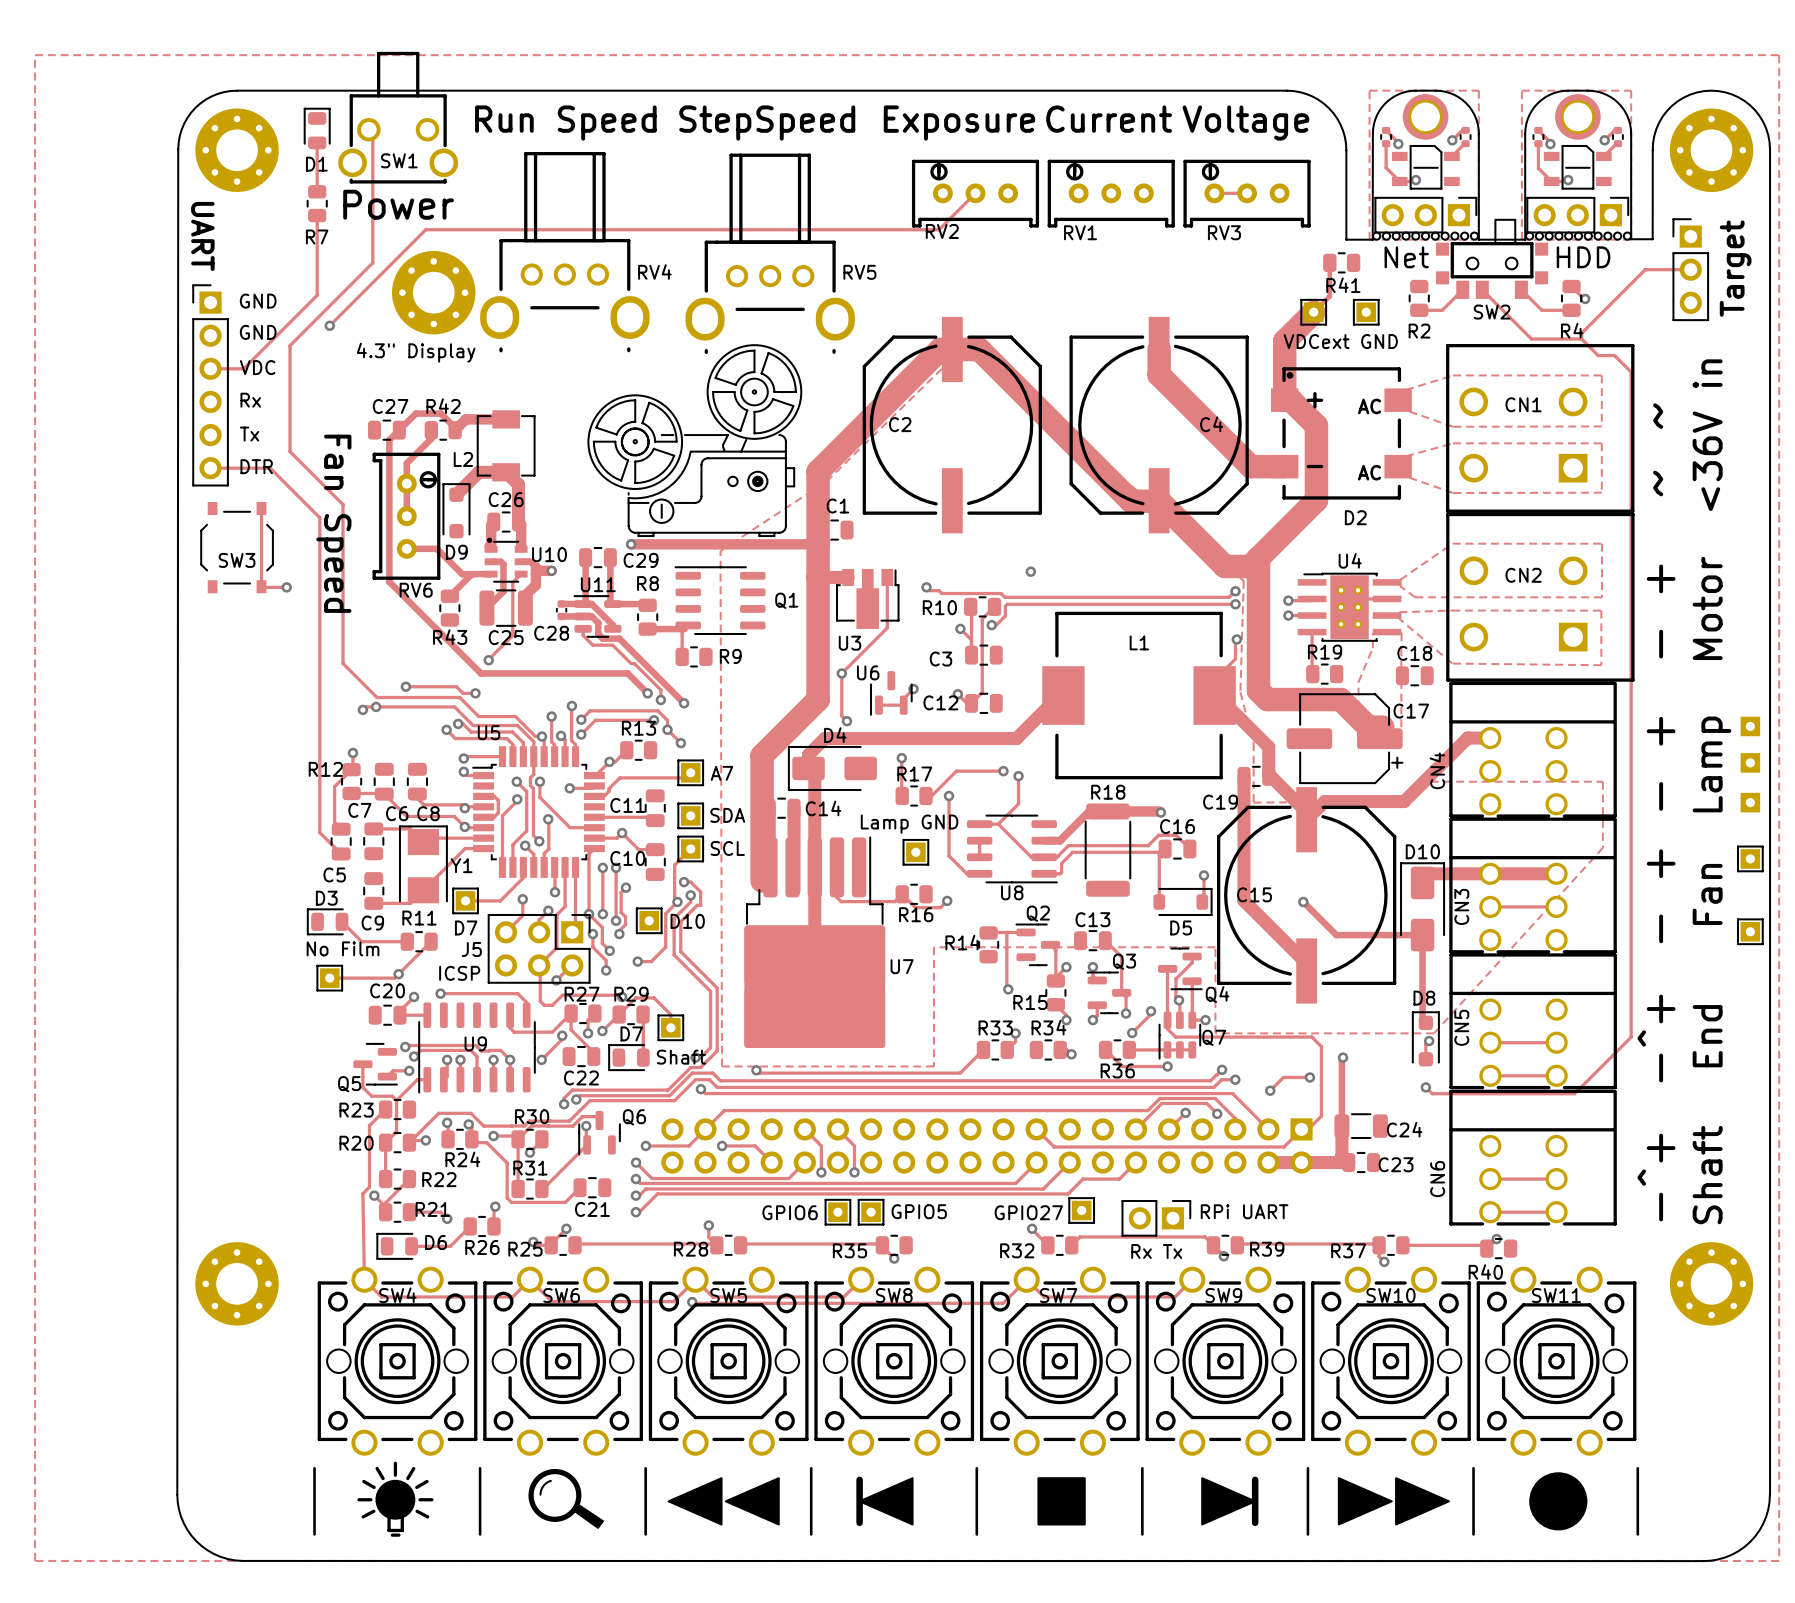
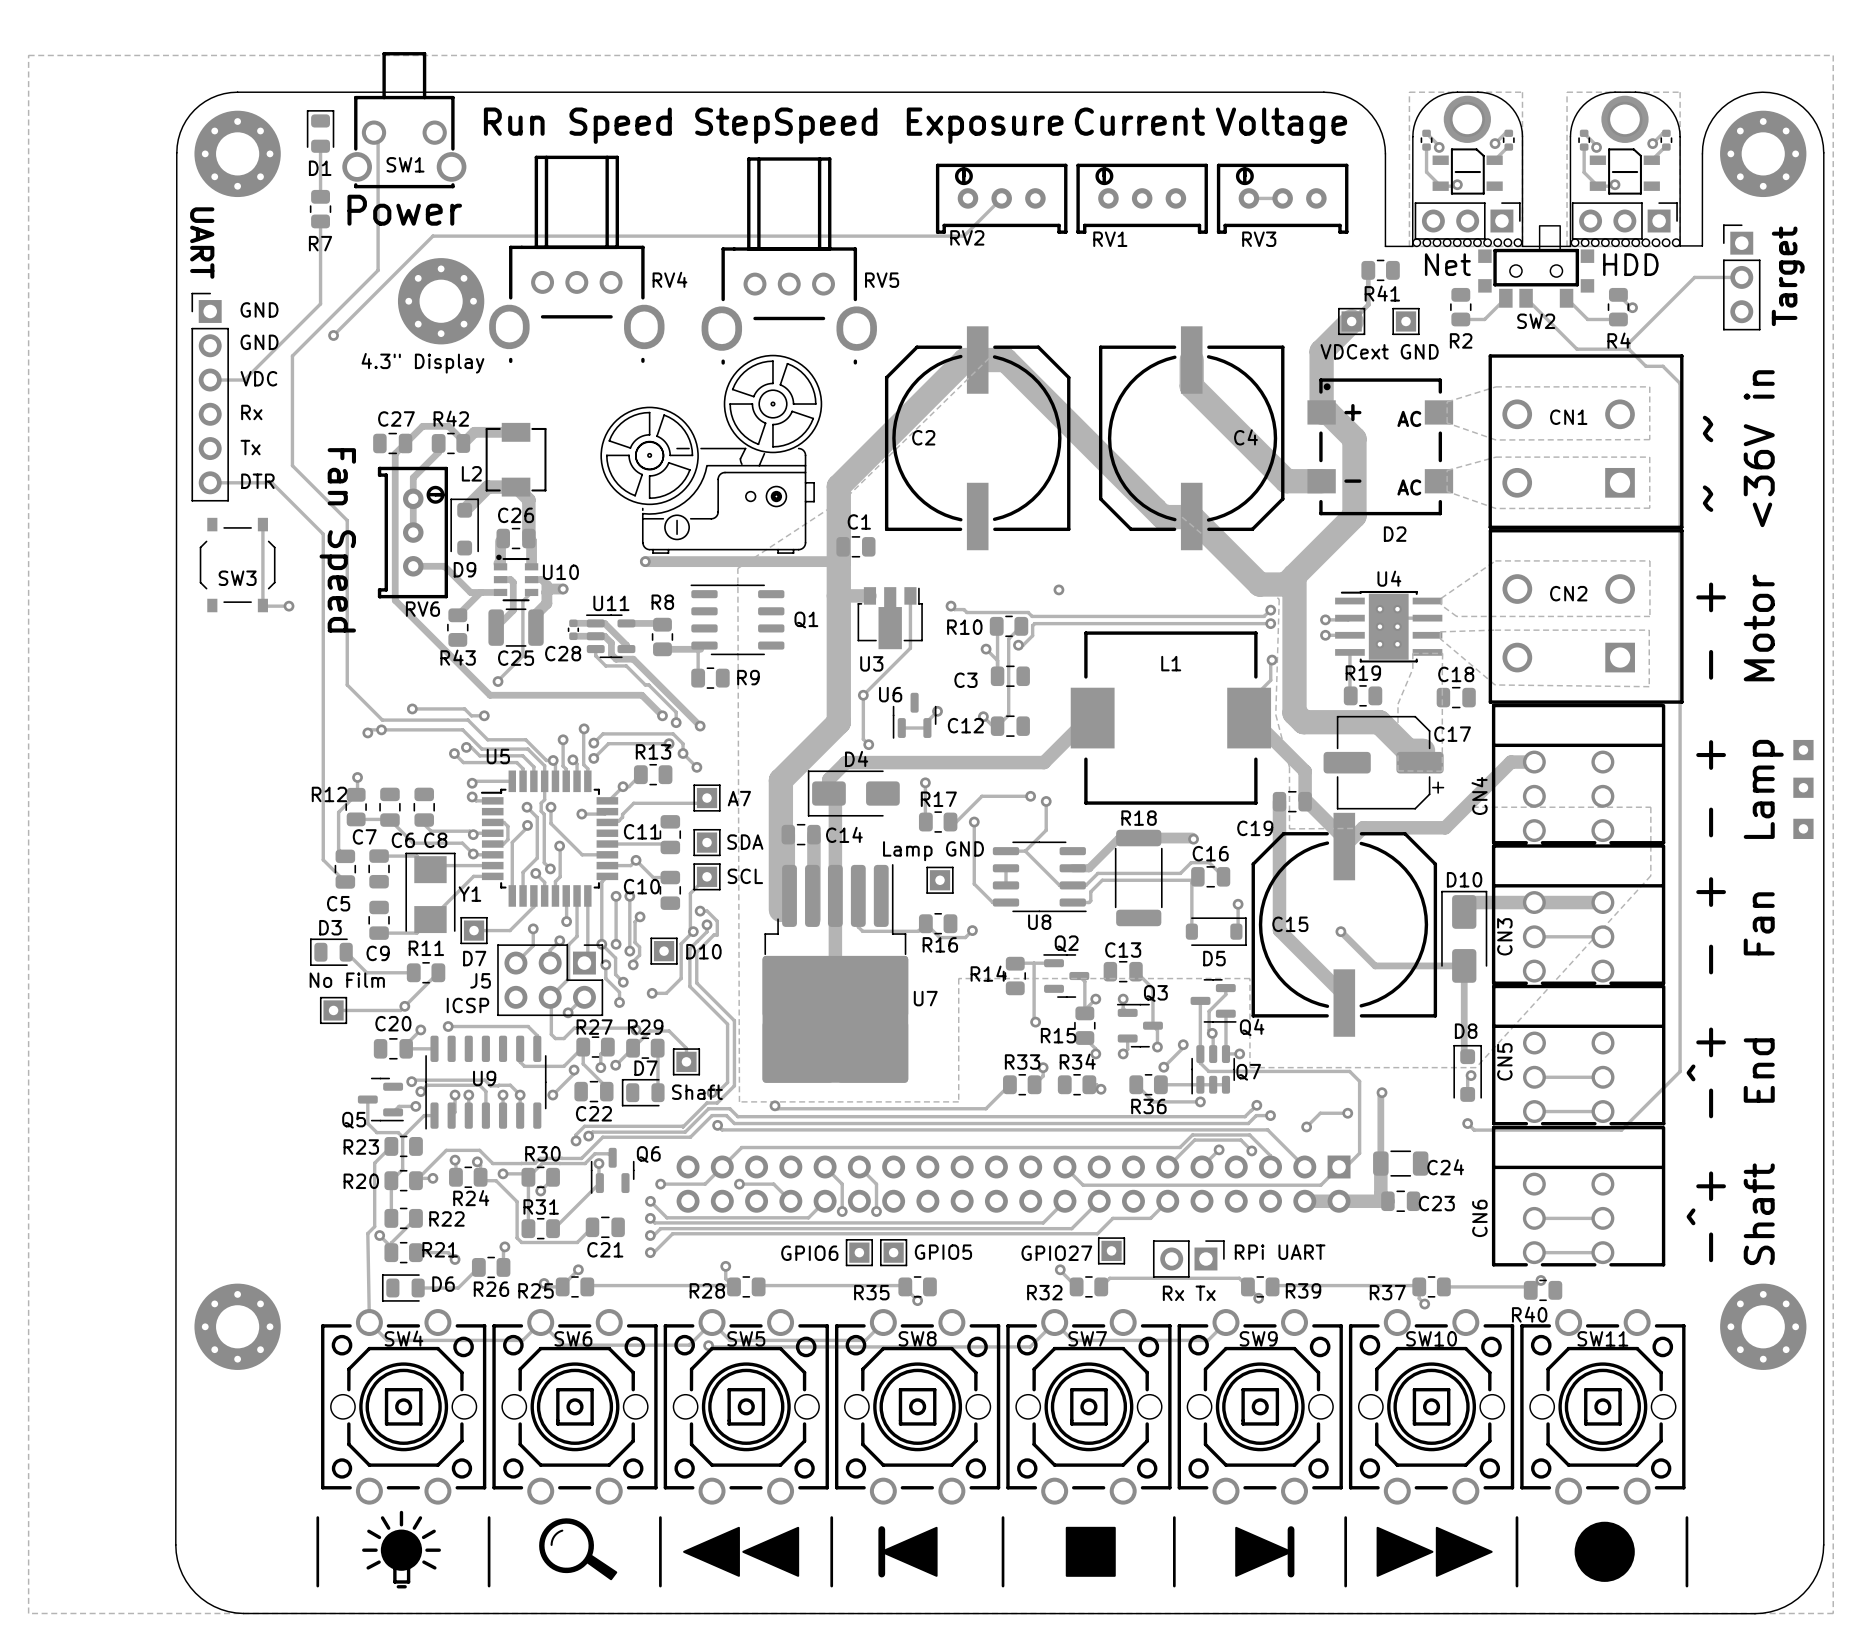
track: (585, 557) (585, 601) (583, 603) -> none
C29: (597, 557) -> none
track: (610, 557) (610, 601) (612, 604) -> none
part: (1750, 858) -> none
part: (1750, 931) -> none

